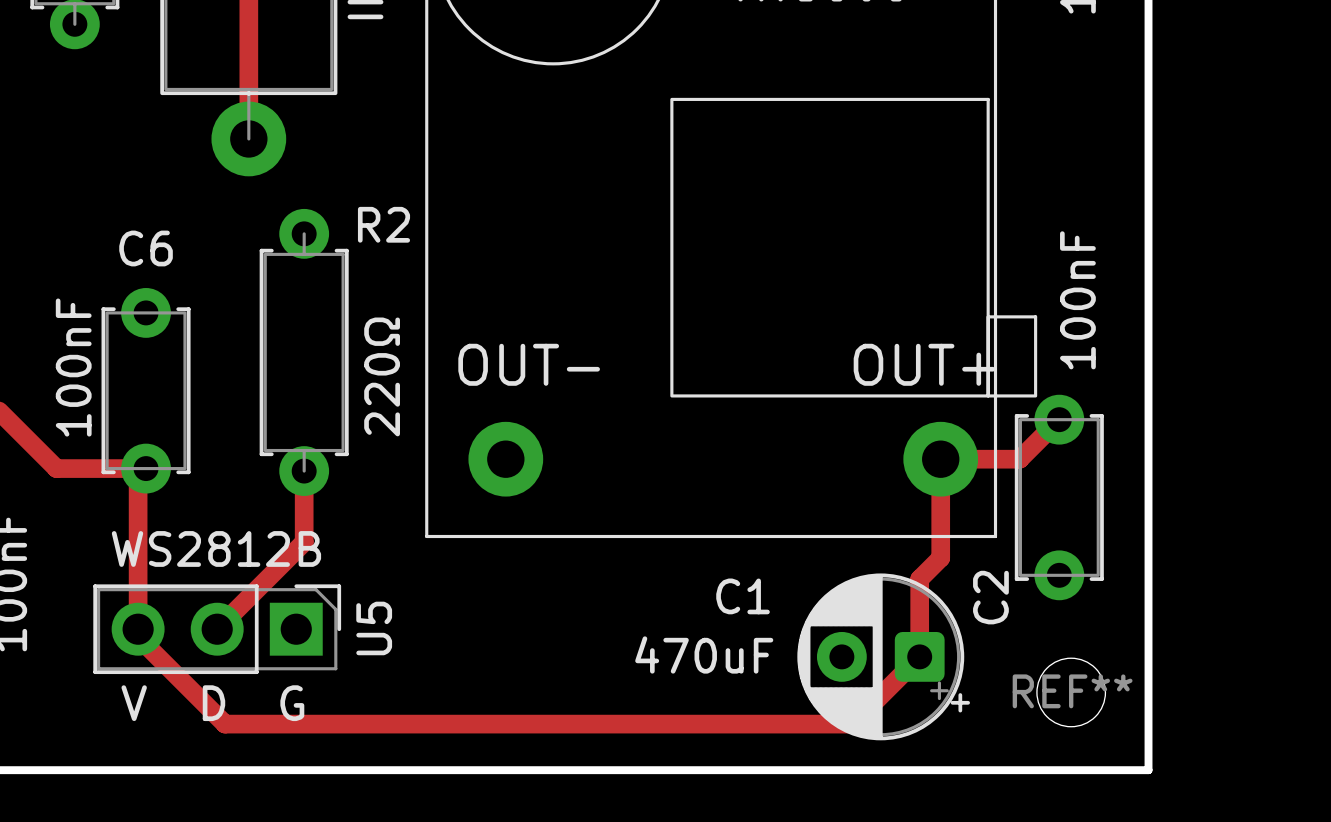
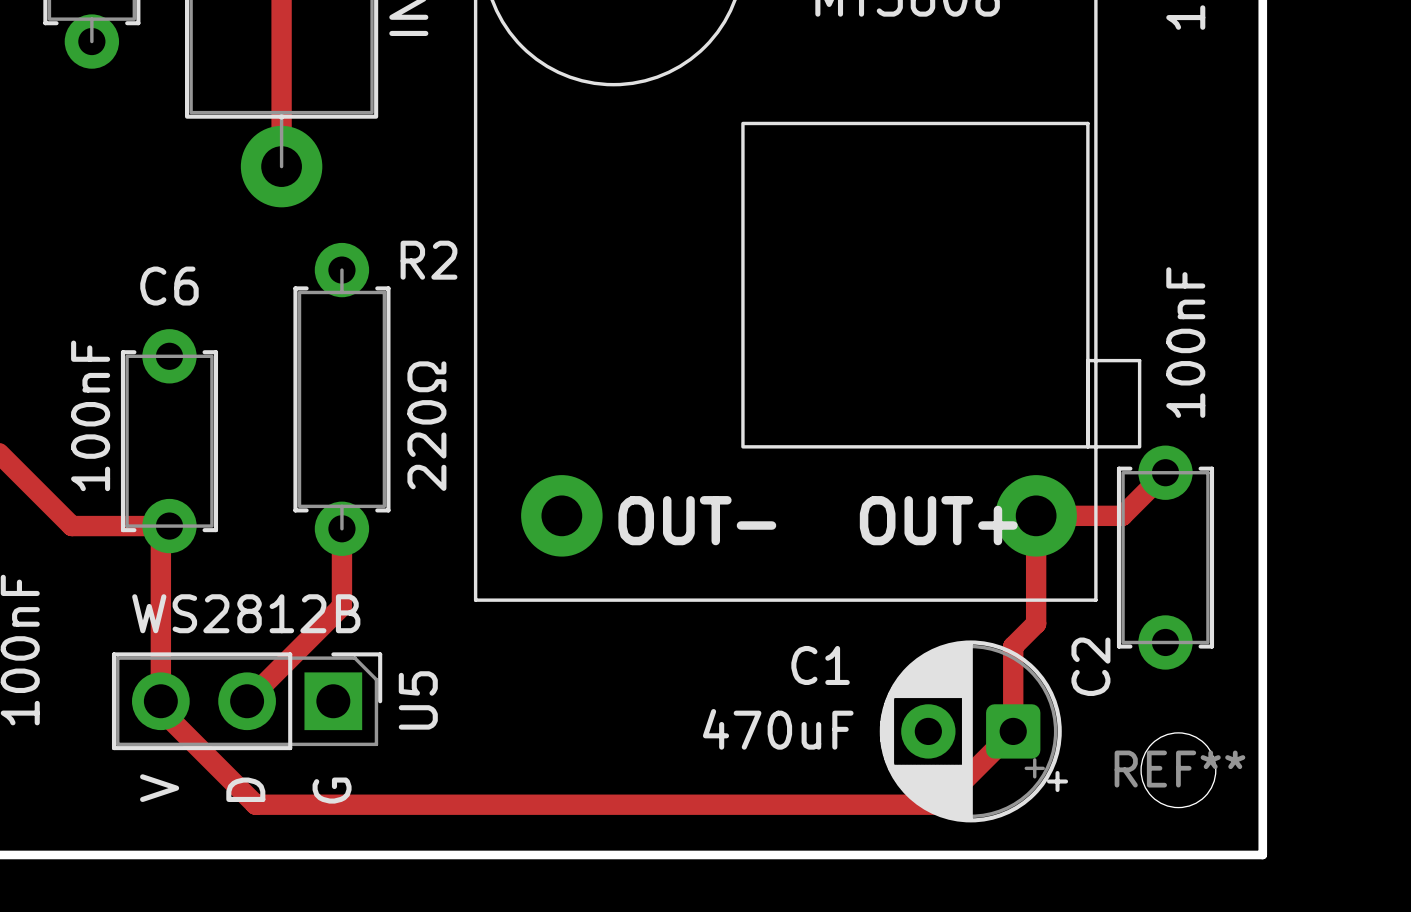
part text position: OUT- (529, 364) -> OUT- (697, 520)
part text position: OUT+ (924, 364) -> OUT+ (938, 520)
text rotation: 0° (134, 703) -> 90° counterclockwise (159, 788)
text rotation: 0° (213, 703) -> 90° counterclockwise (245, 789)
text rotation: 0° (292, 703) -> 90° counterclockwise (332, 790)

